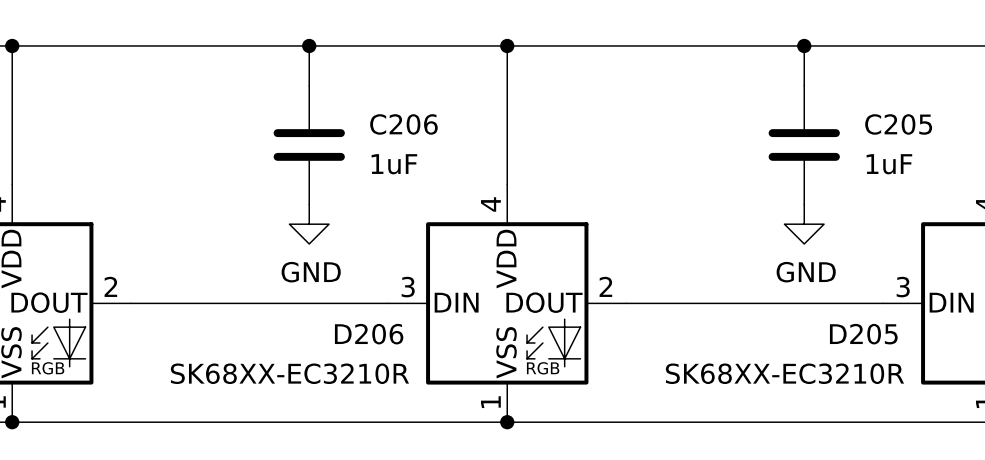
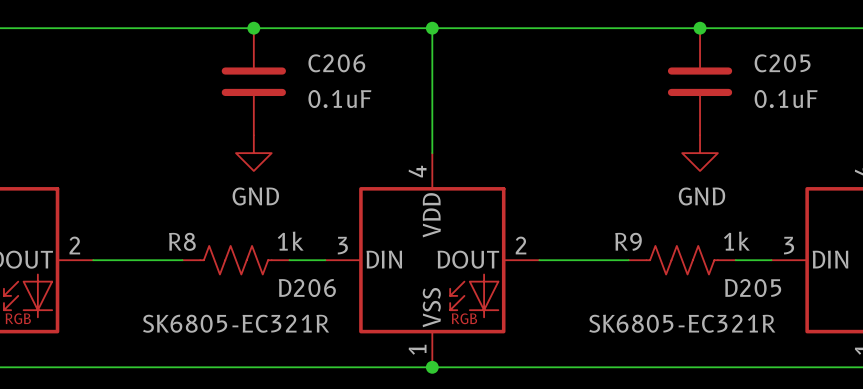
C206 position: (309, 144) -> (253, 81)
C205 position: (804, 144) -> (700, 81)
C206 value: 1uF (394, 164) -> 0.1uF (339, 99)
C205 value: 1uF (889, 164) -> 0.1uF (786, 99)
power symbol position: GND (309, 224) -> GND (253, 153)
power symbol position: GND (804, 224) -> GND (700, 153)
wire: (230, 303) (348, 303) -> none
R8: none -> 1k (235, 260)
wire: (725, 303) (843, 303) -> none
R9: none -> 1k (682, 260)
D206 value: SK68XX-EC3210R (289, 373) -> SK6805-EC321R (236, 323)
D205 value: SK68XX-EC3210R (784, 373) -> SK6805-EC321R (682, 323)

